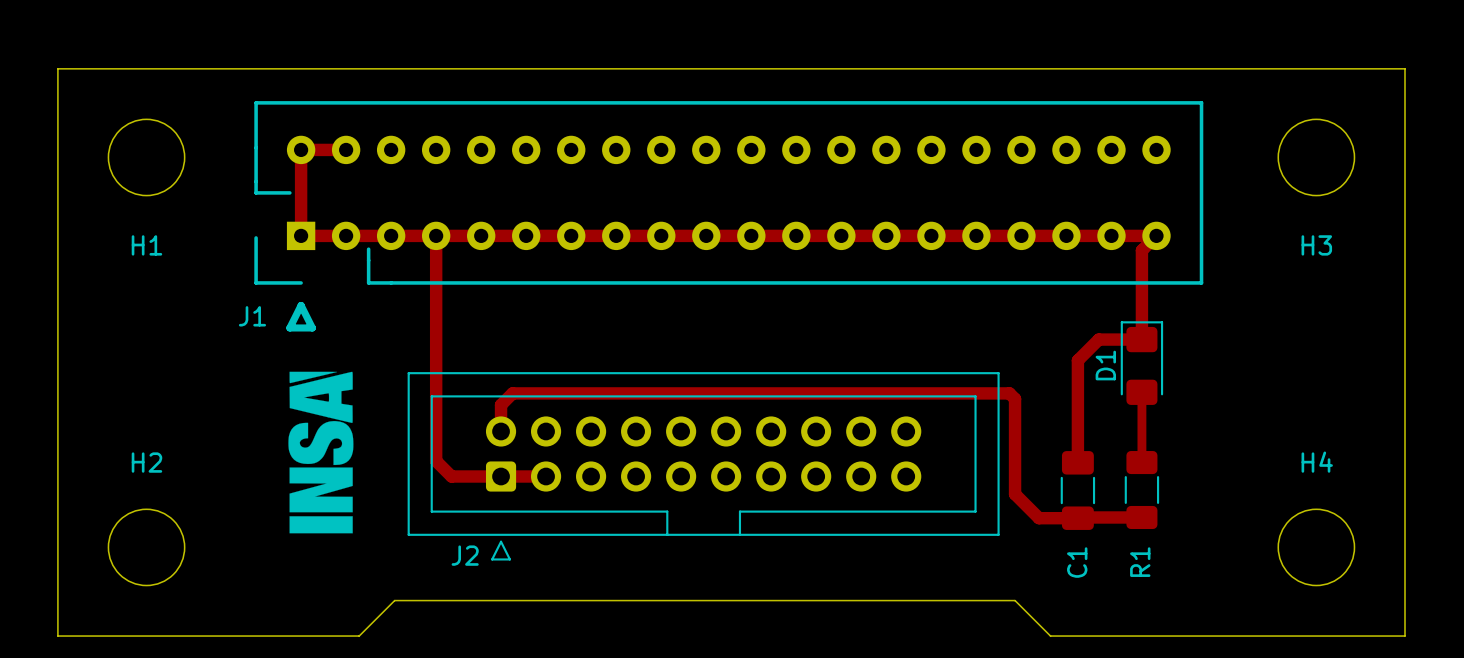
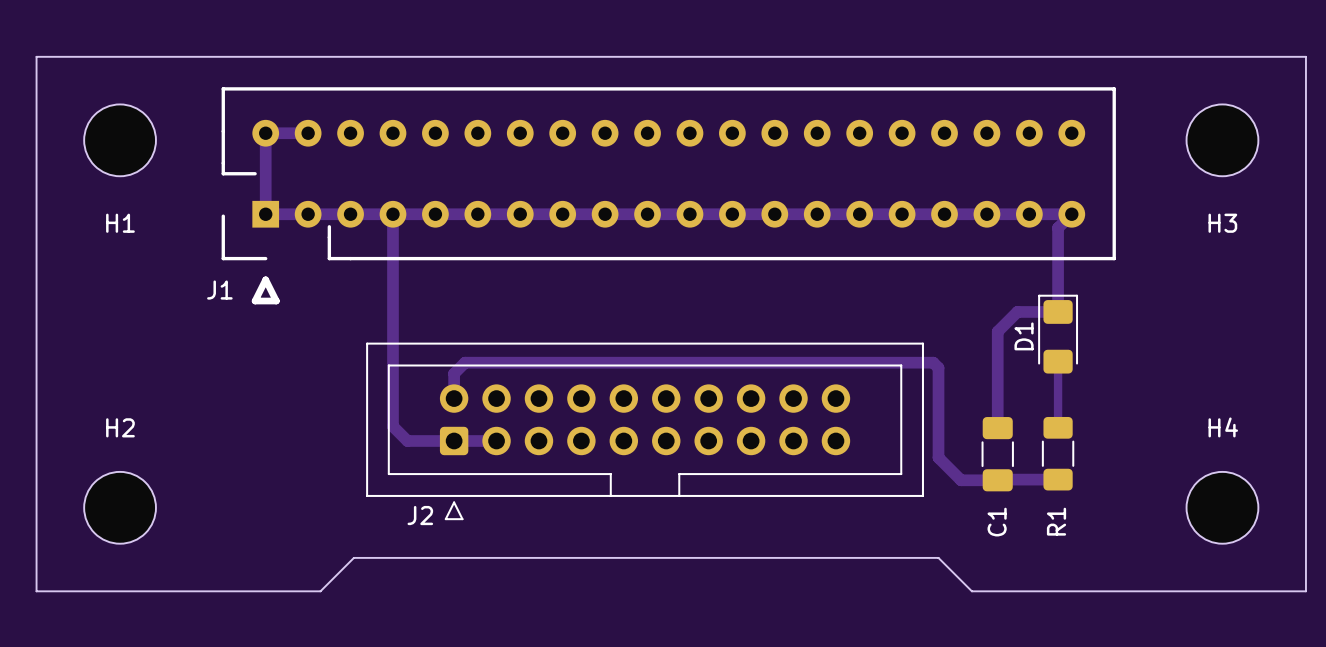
drawing: [288, 371, 354, 534] -> none

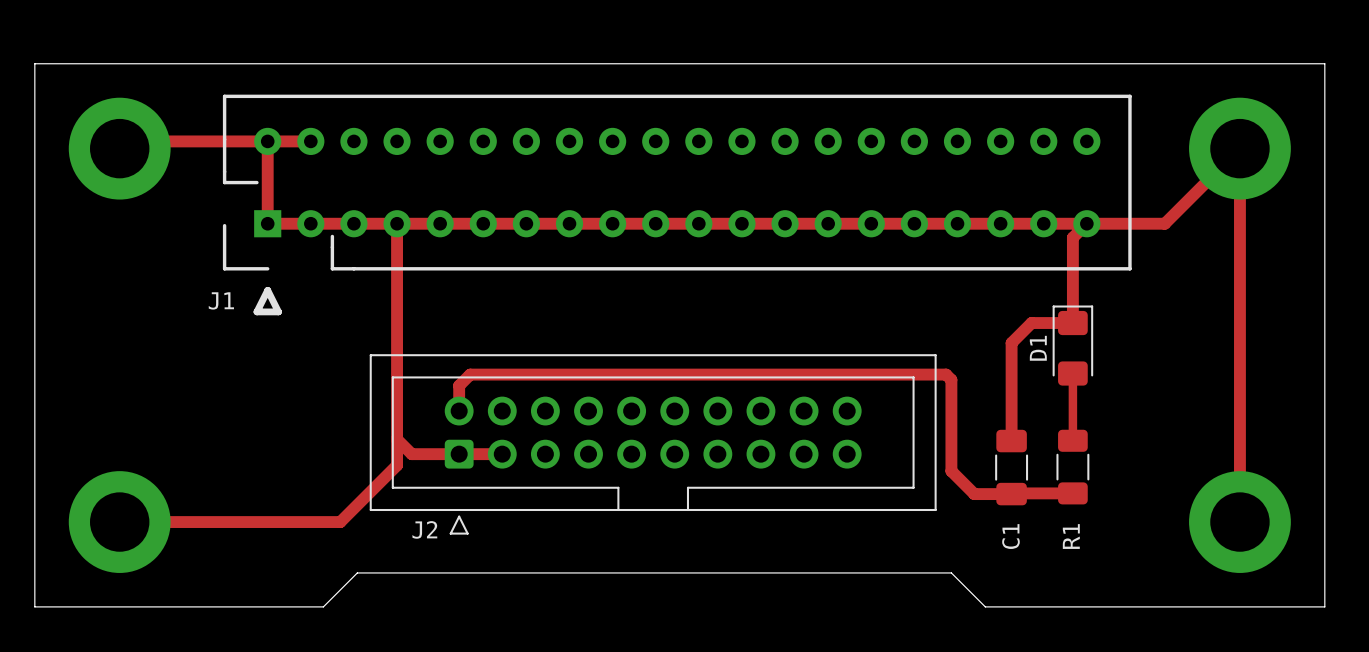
track: none -> (267, 141) (126, 141) (119, 148)
H1: (120, 140) -> none
via: none -> (119, 148)
H3: (1222, 140) -> none
via: none -> (1239, 148)
track: none -> (1086, 223) (1164, 223) (1239, 148) (1239, 522)
track: none -> (397, 439) (397, 465) (340, 522) (119, 522)
H2: (120, 507) -> none
via: none -> (119, 522)
H4: (1222, 507) -> none
via: none -> (1239, 522)

